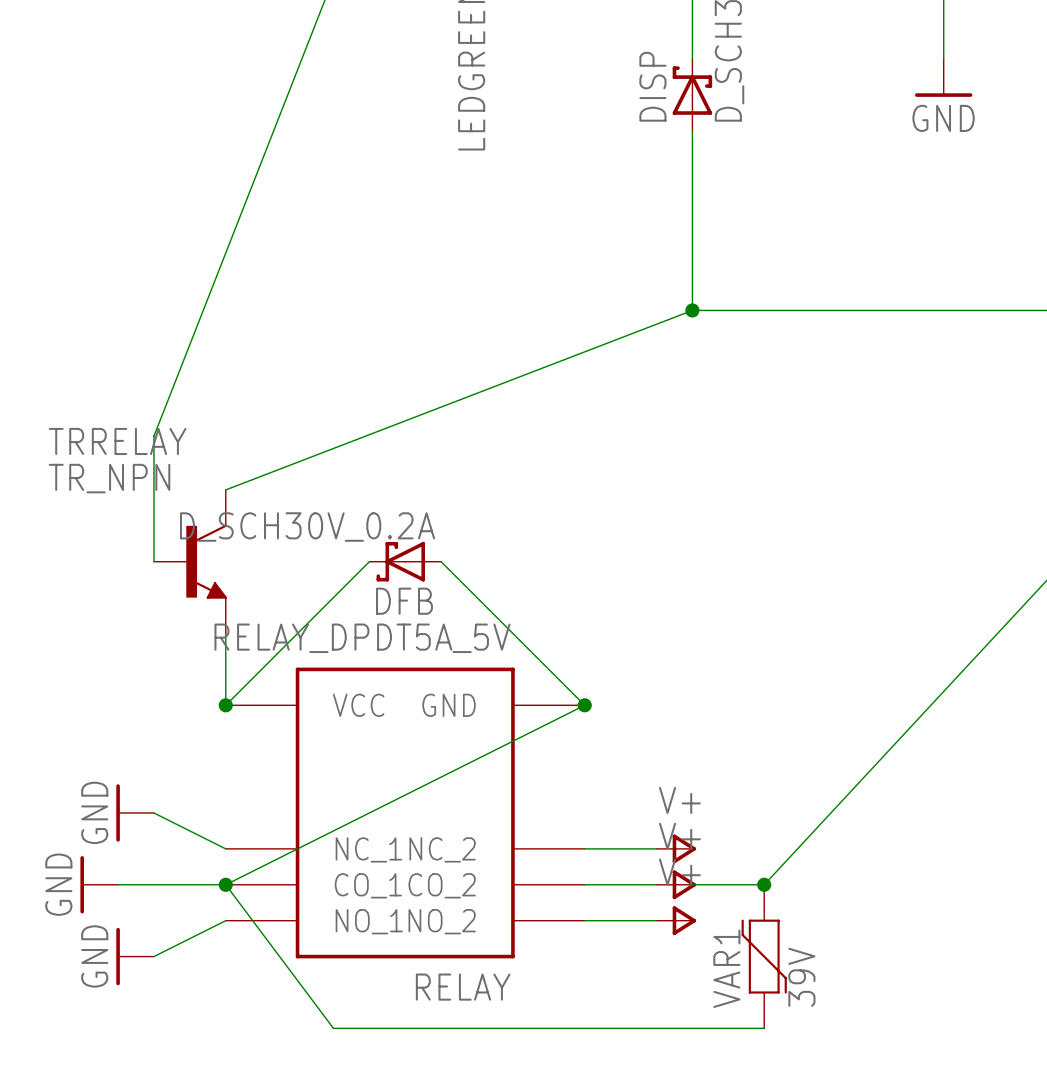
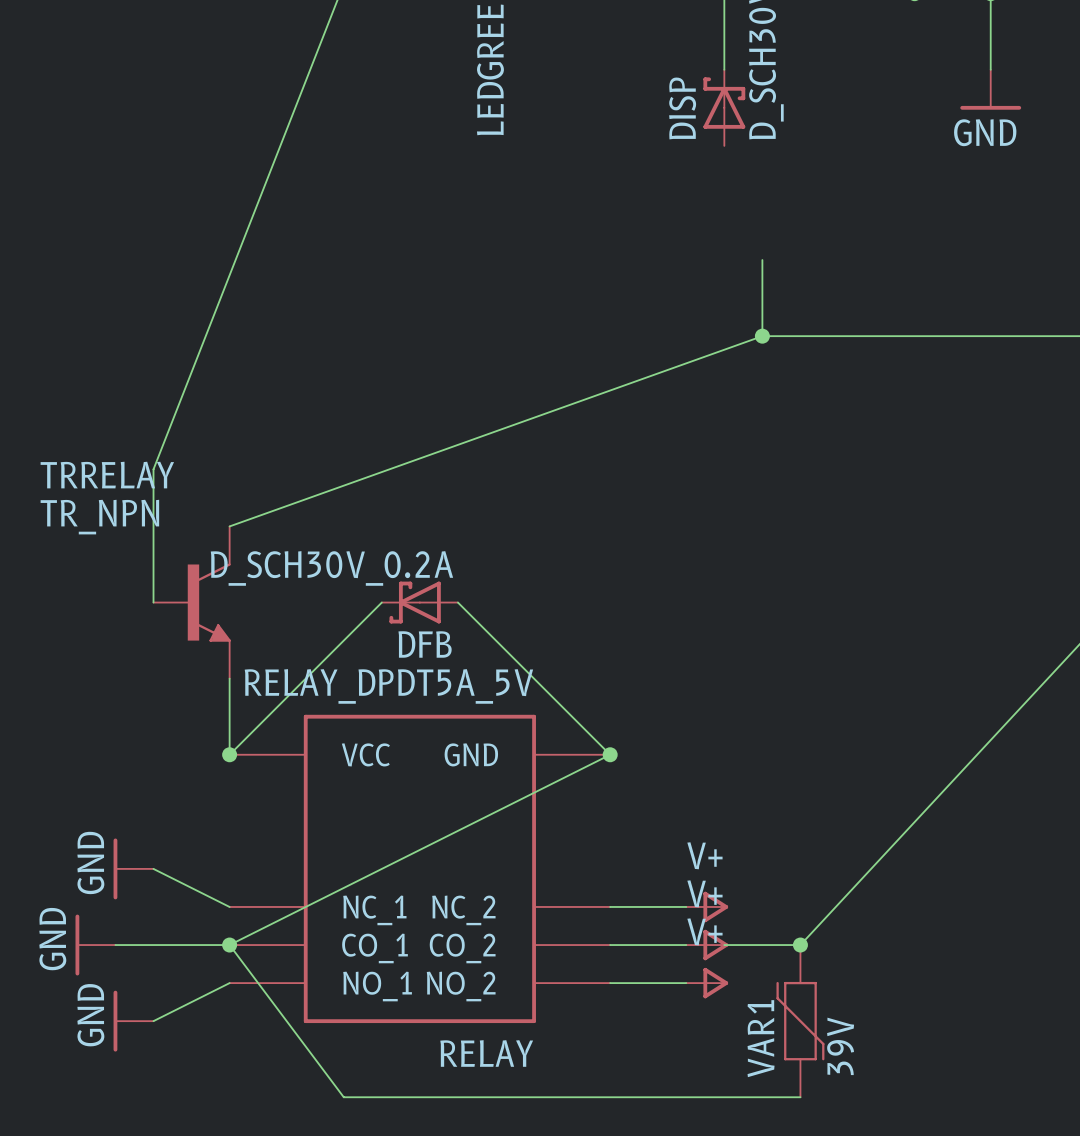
wire: (692, 130) (692, 310) -> none
wire: (692, 310) (225, 489) -> (762, 260) (762, 336) (229, 526)
wire: (692, 310) (728, 310) -> none
junction position: (692, 310) -> (762, 336)

